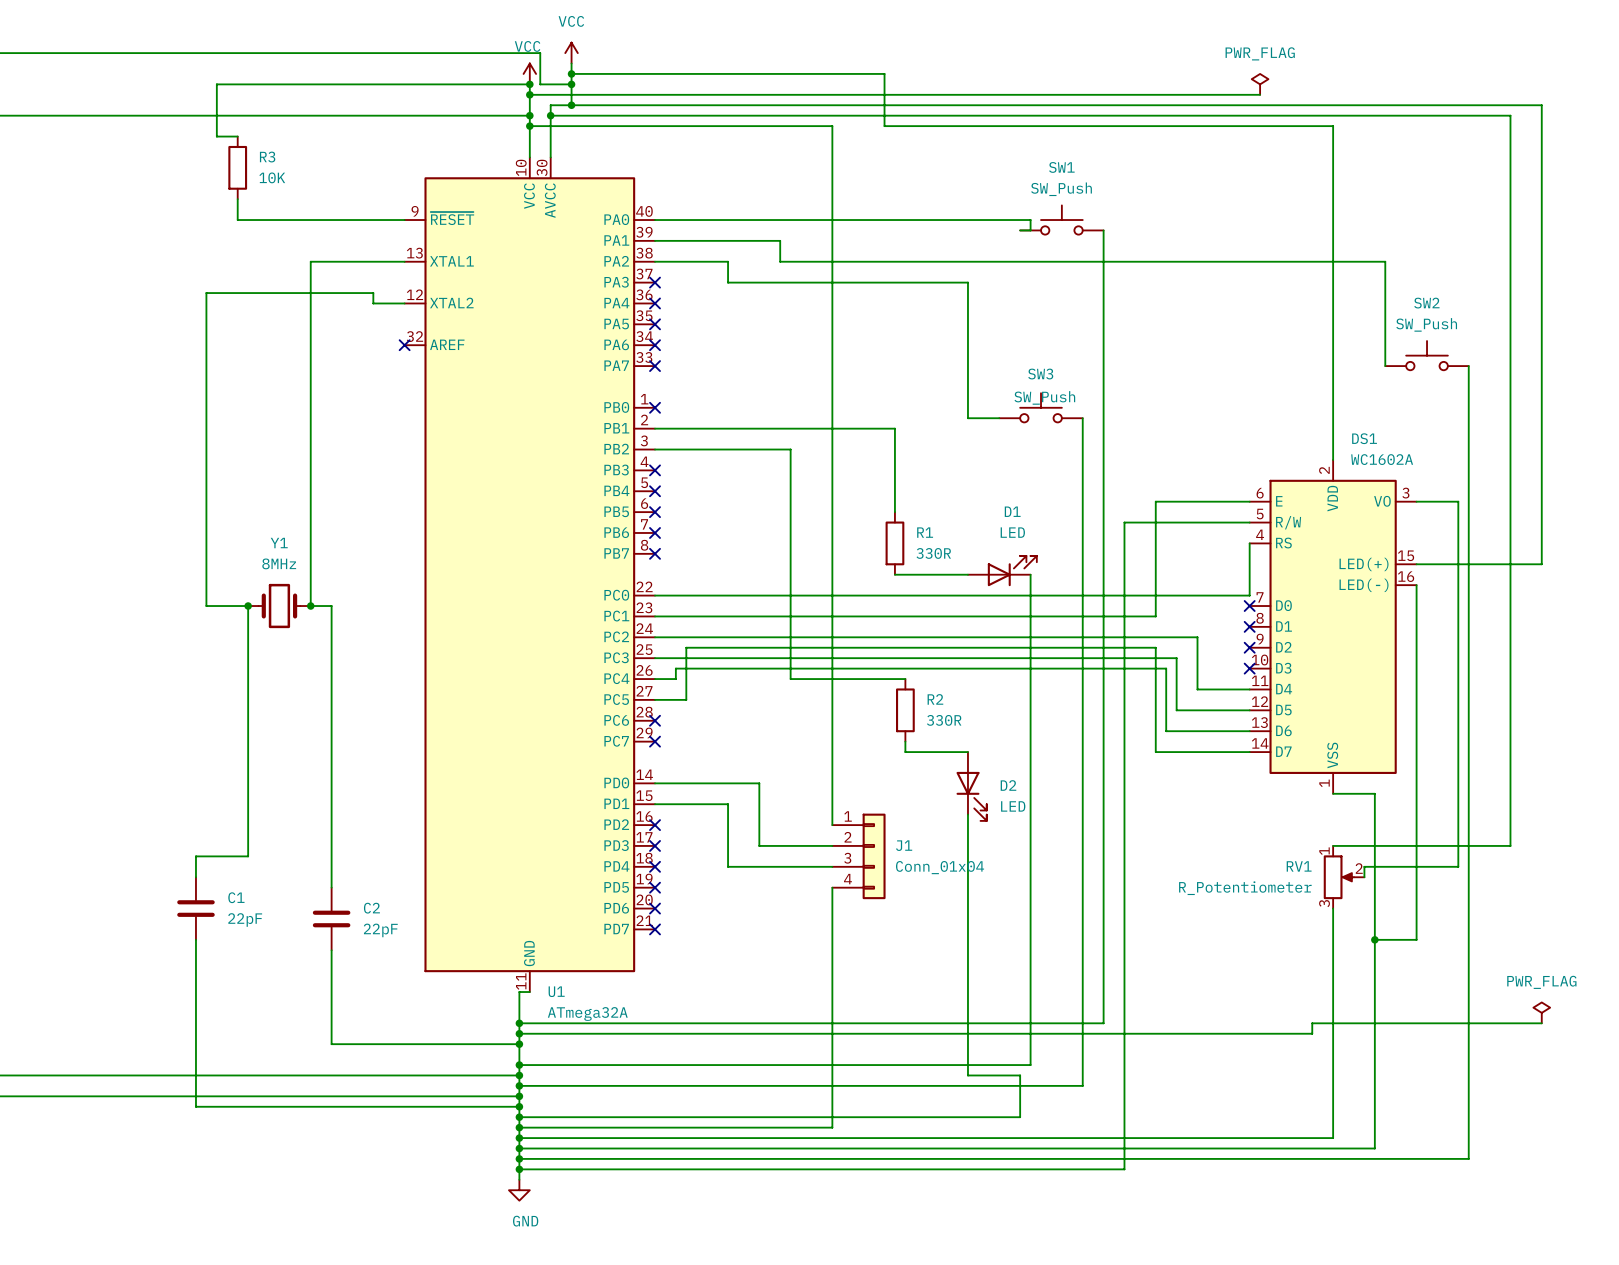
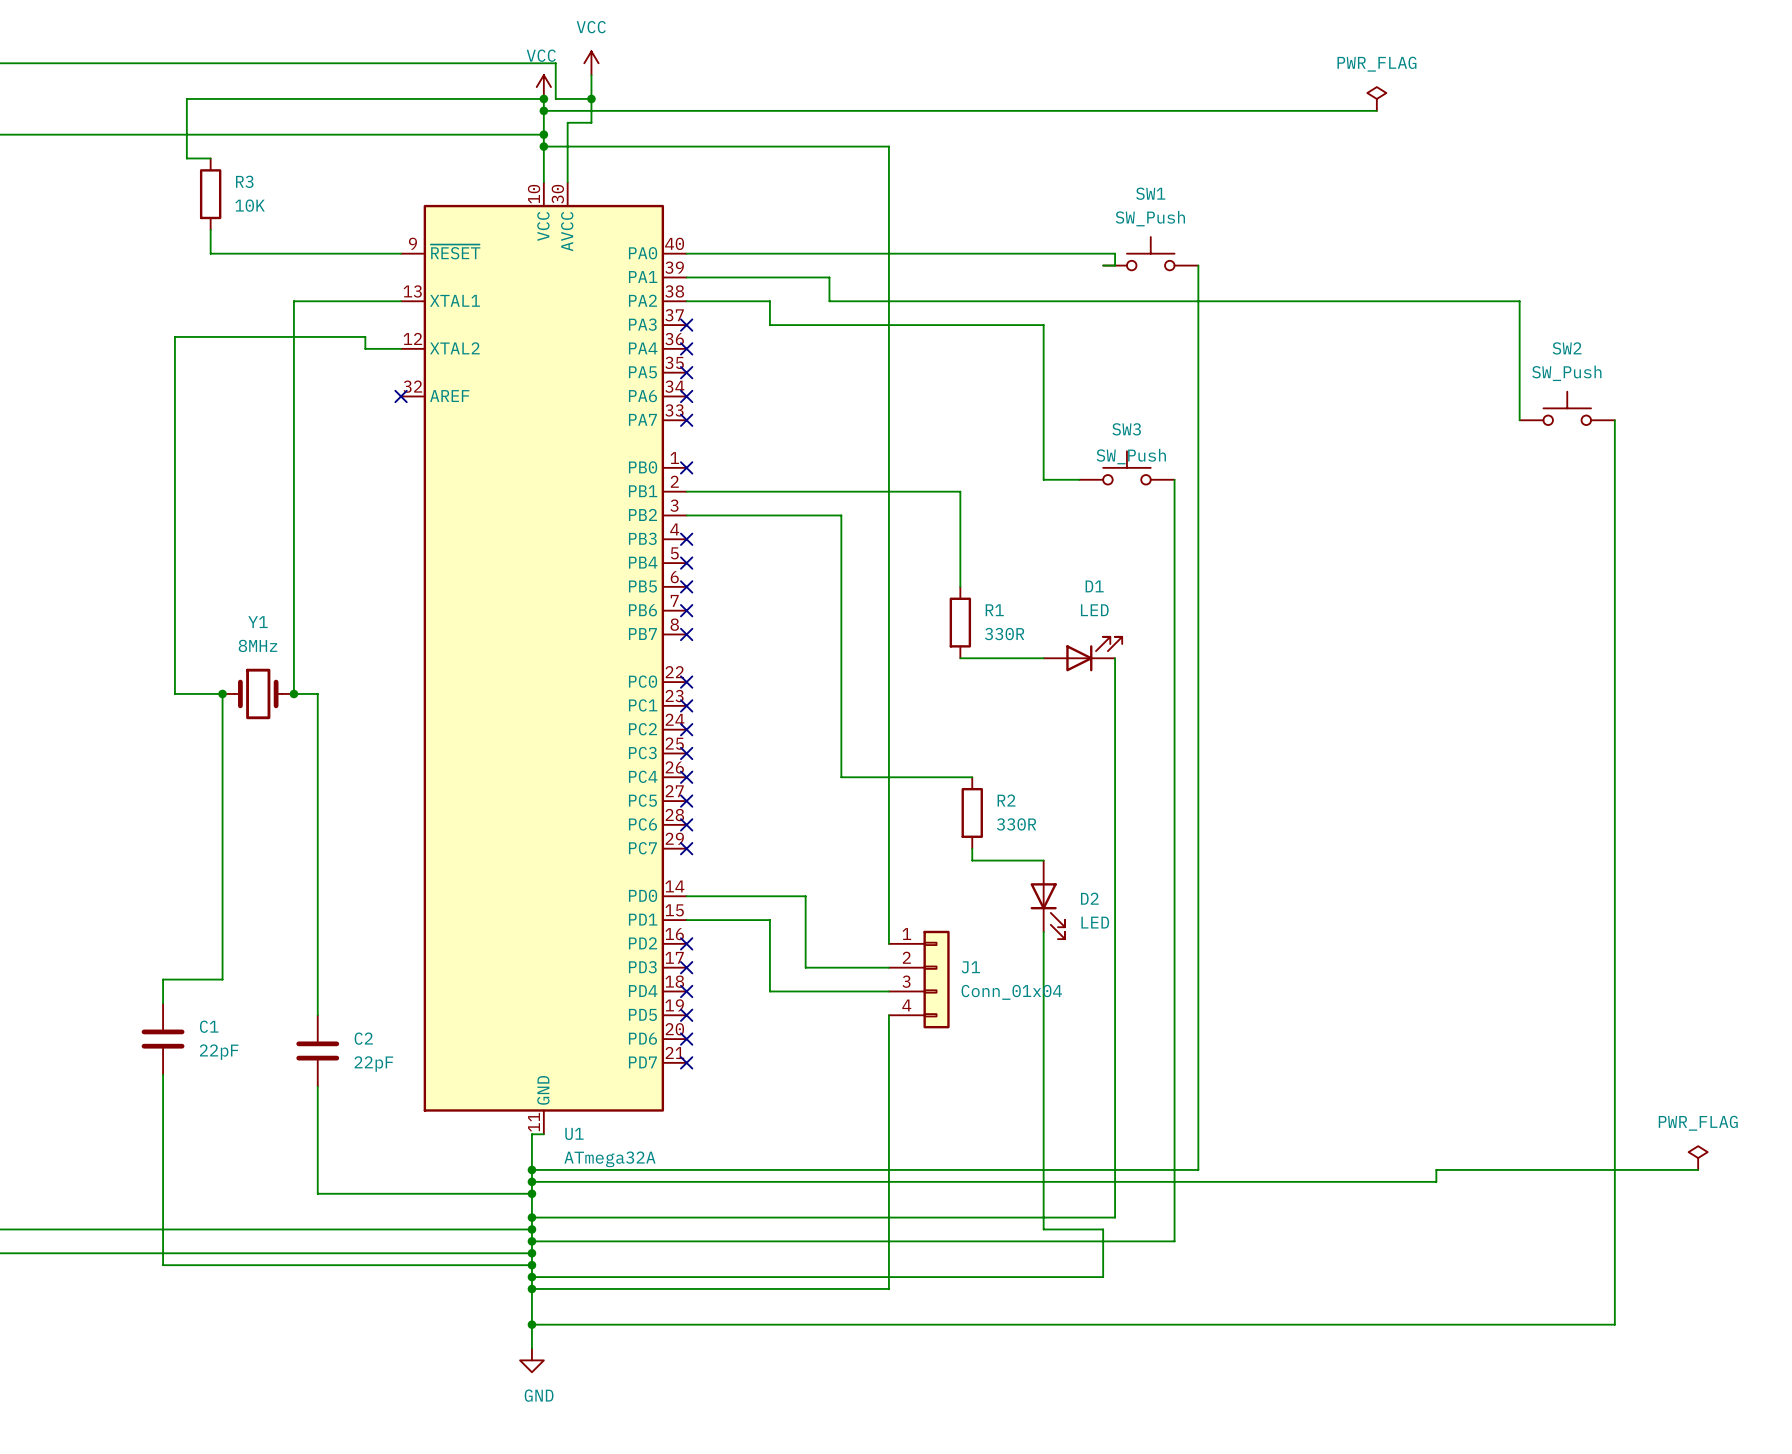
wire: (571, 73) (884, 73) (884, 126) (1333, 126) (1333, 459) -> none
junction: (571, 73) -> none
wire: (571, 105) (1541, 105) (1541, 564) (1416, 564) -> none
junction: (571, 105) -> none
wire: (550, 115) (1510, 115) (1510, 845) (1333, 845) -> none
junction: (550, 115) -> none
wire: (1249, 501) (1155, 501) (1155, 616) (655, 616) -> none
wire: (1416, 501) (1458, 501) (1458, 866) (1364, 866) (1364, 877) -> none
wire: (1249, 522) (1124, 522) (1124, 1169) (519, 1169) -> none
wire: (1249, 543) (1249, 595) (655, 595) -> none
wire: (1416, 585) (1416, 939) (1374, 939) -> none
no-connect mark: none -> (686, 682)
no-connect mark: (1249, 606) -> none
no-connect mark: none -> (686, 705)
no-connect mark: (1249, 626) -> none
DS1: WC1602A (1333, 626) -> none
wire: (655, 637) (1197, 637) (1197, 689) (1249, 689) -> none
no-connect mark: none -> (686, 729)
no-connect mark: (1249, 647) -> none
wire: (655, 658) (1176, 658) (1176, 710) (1249, 710) -> none
no-connect mark: none -> (686, 753)
no-connect mark: (1249, 668) -> none
wire: (655, 679) (675, 679) (675, 668) (1166, 668) (1166, 731) (1249, 731) -> none
no-connect mark: none -> (686, 777)
wire: (655, 699) (686, 699) (686, 647) (1155, 647) (1155, 752) (1249, 752) -> none
no-connect mark: none -> (686, 801)
wire: (1333, 793) (1374, 793) (1374, 1148) (519, 1148) -> none
RV1: R_Potentiometer (1344, 877) -> none
wire: (1333, 908) (1333, 1138) (519, 1138) -> none
junction: (1374, 939) -> none
junction: (519, 1138) -> none
junction: (519, 1148) -> none
junction: (519, 1169) -> none

